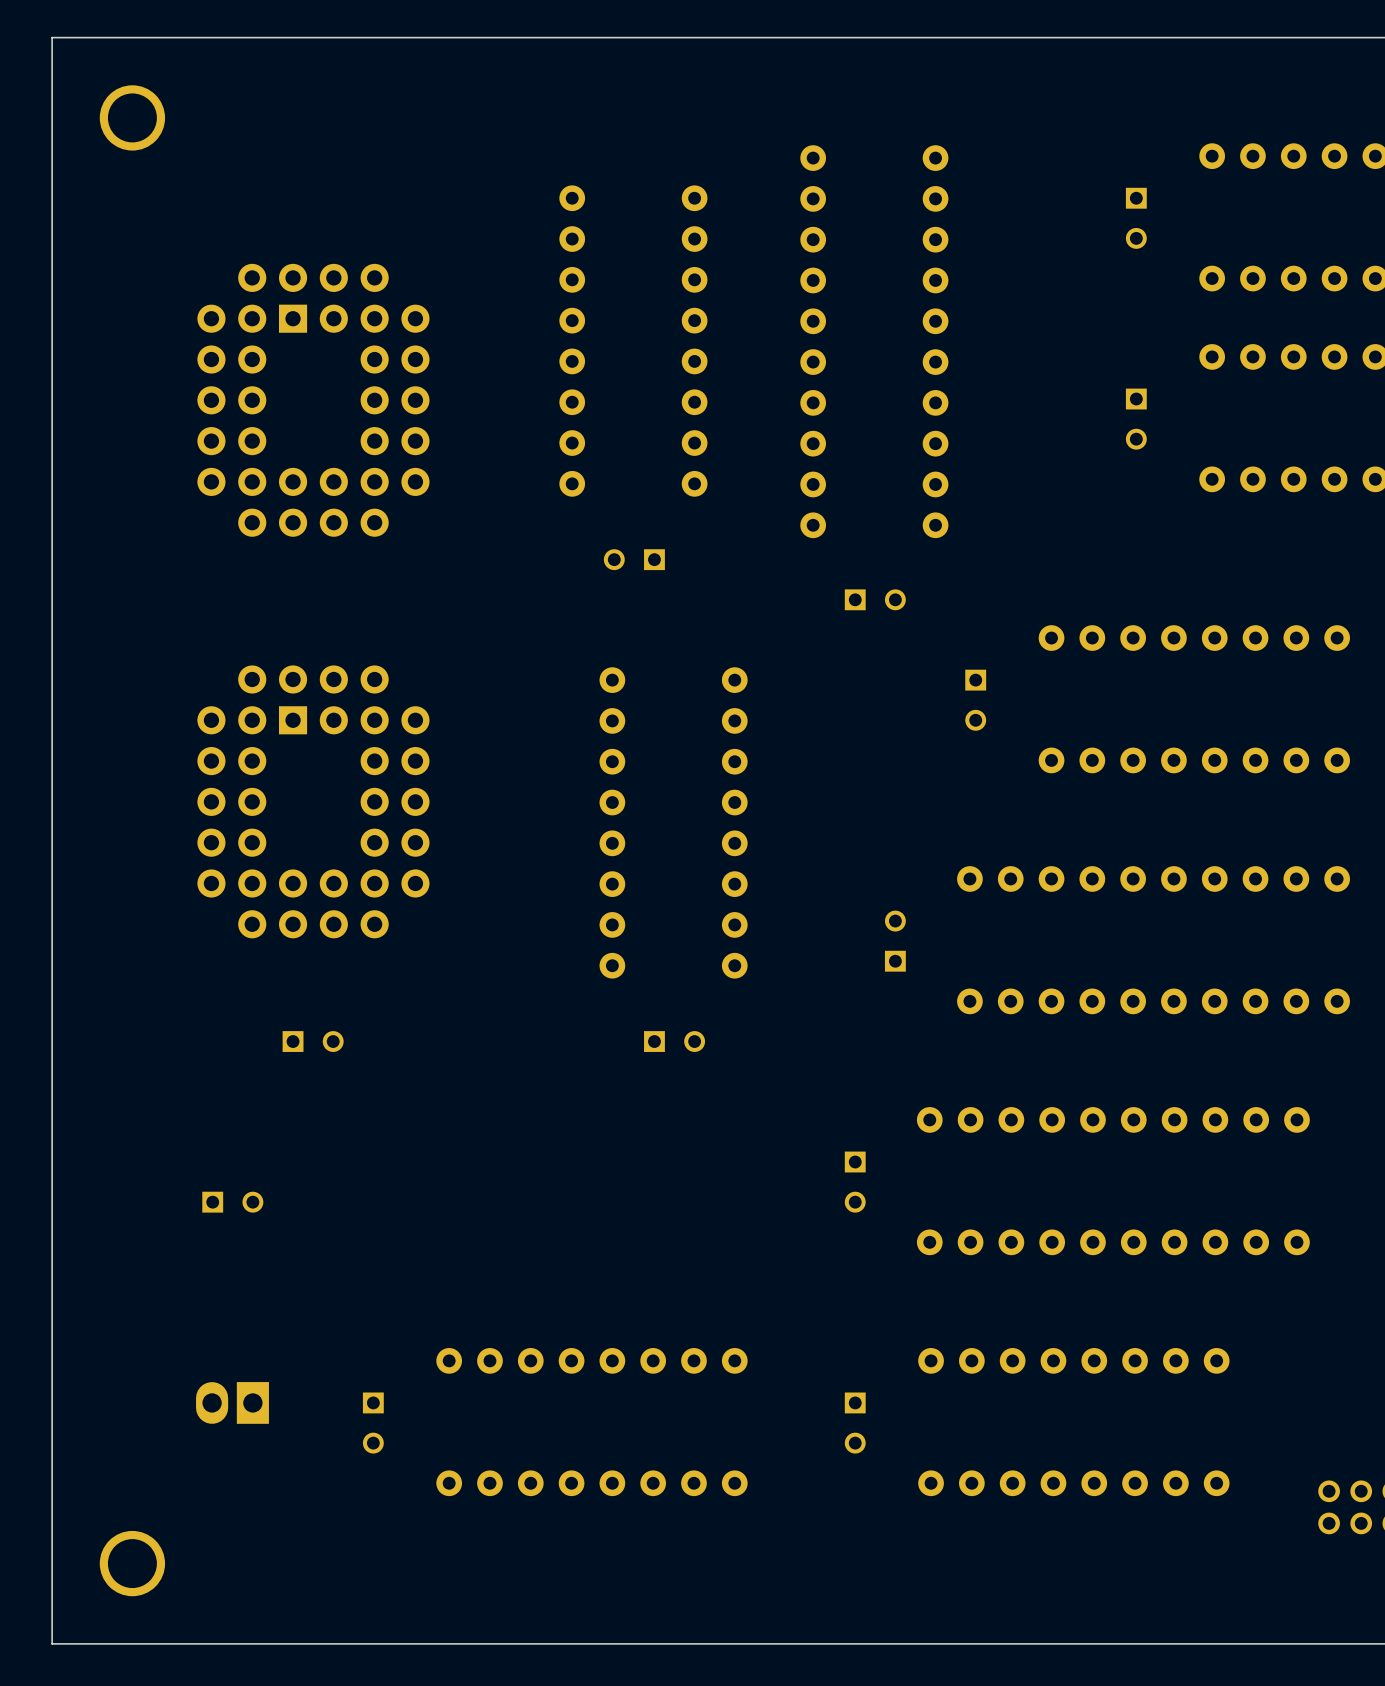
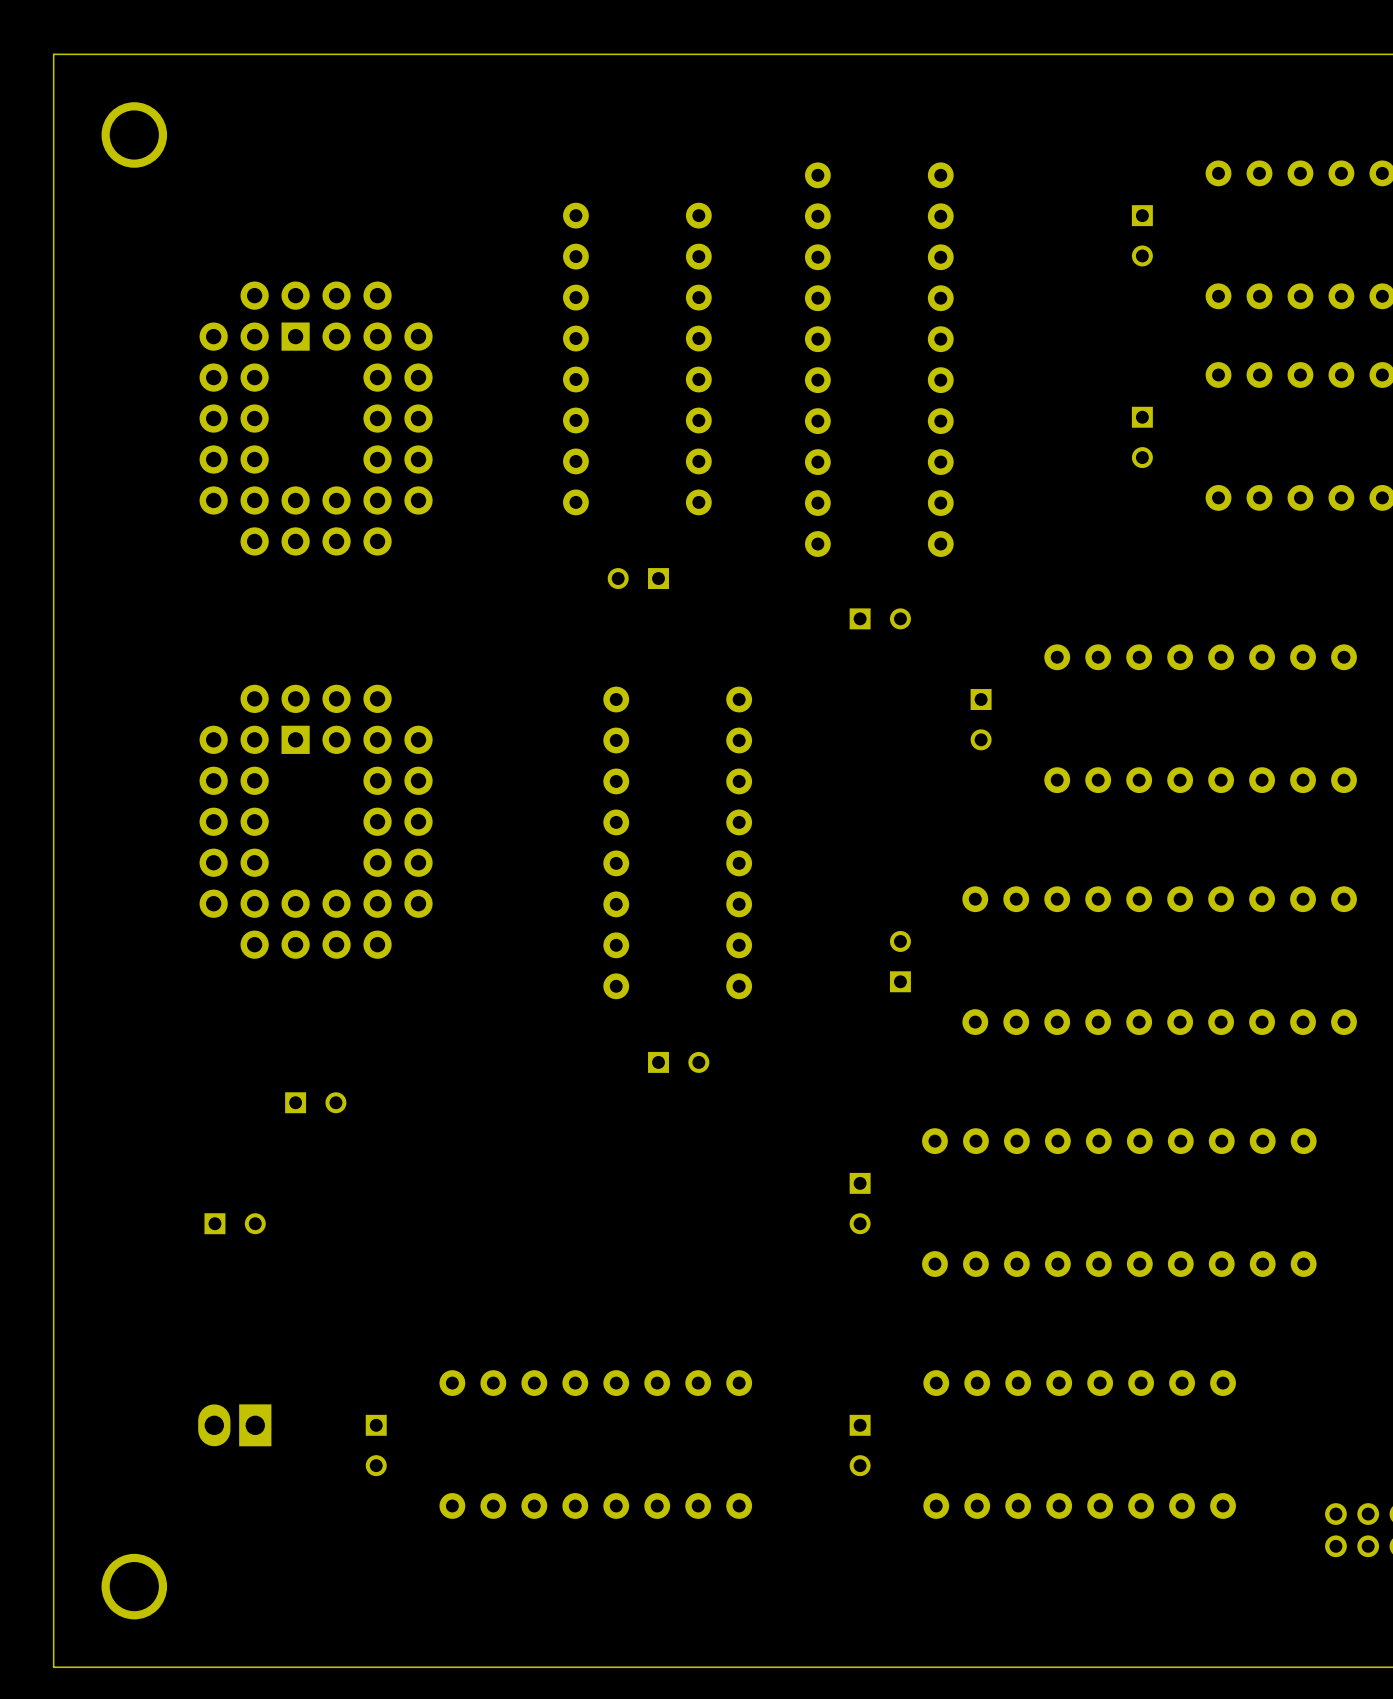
part position: (313, 1041) -> (315, 1102)

